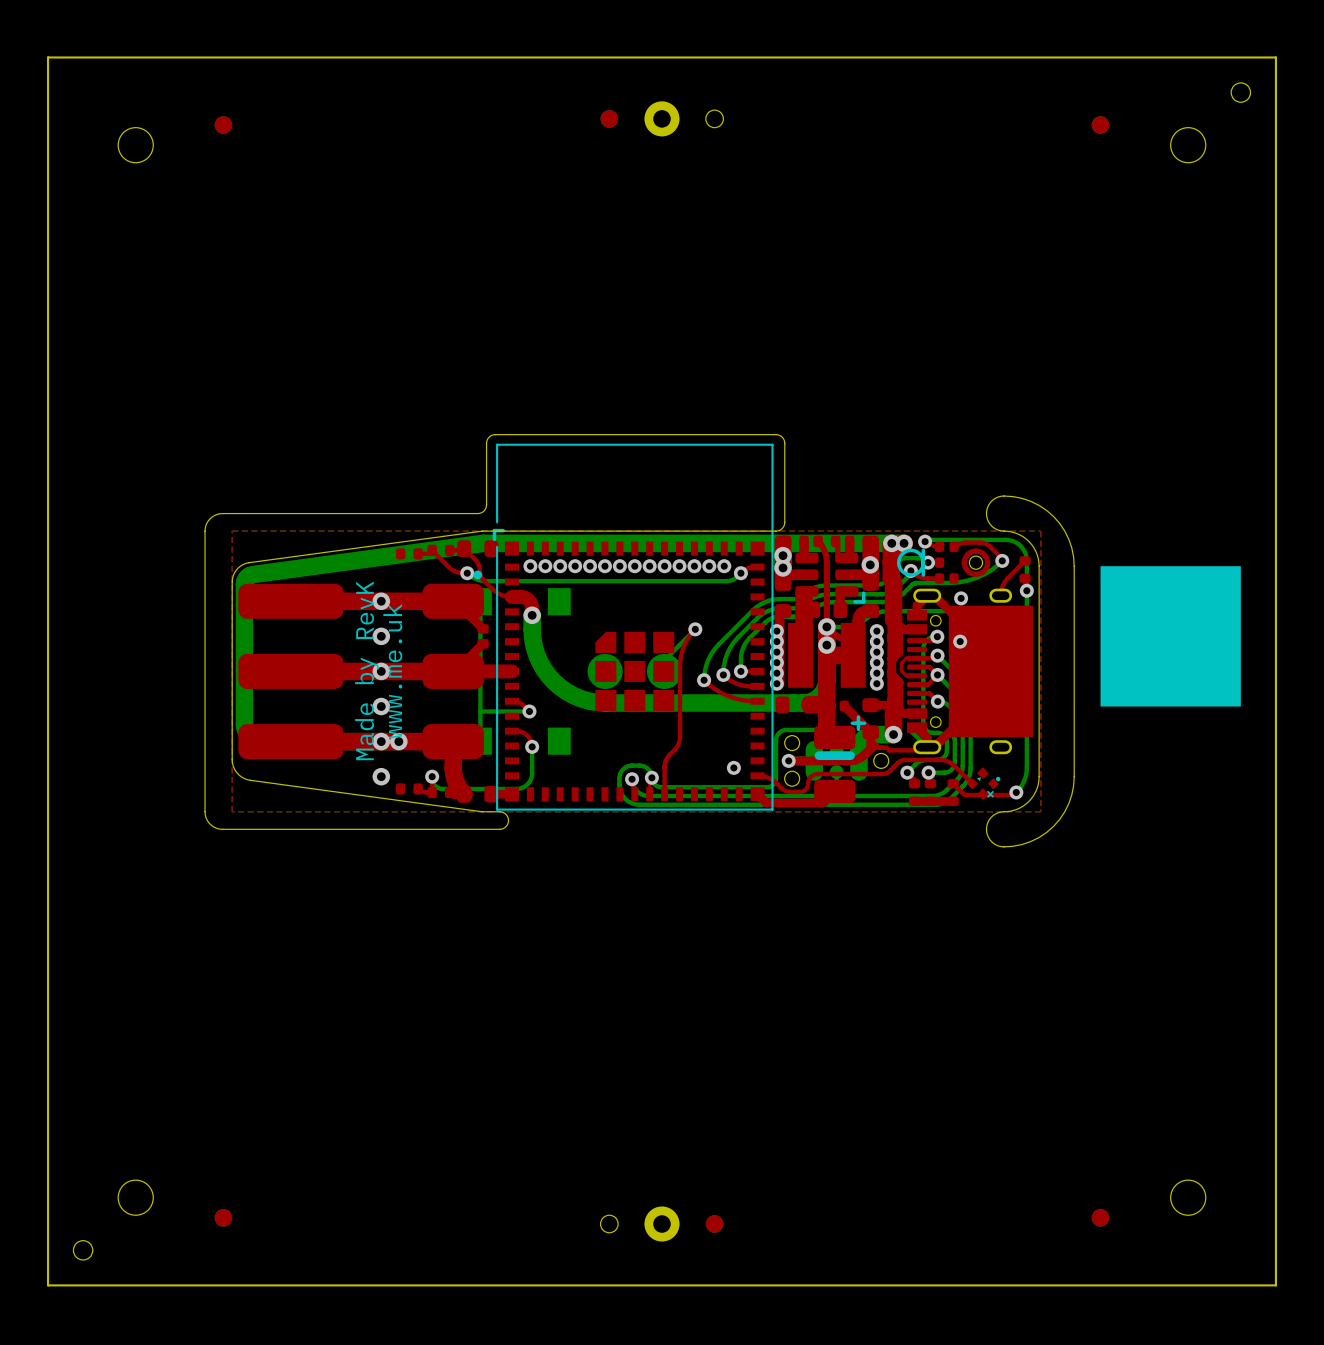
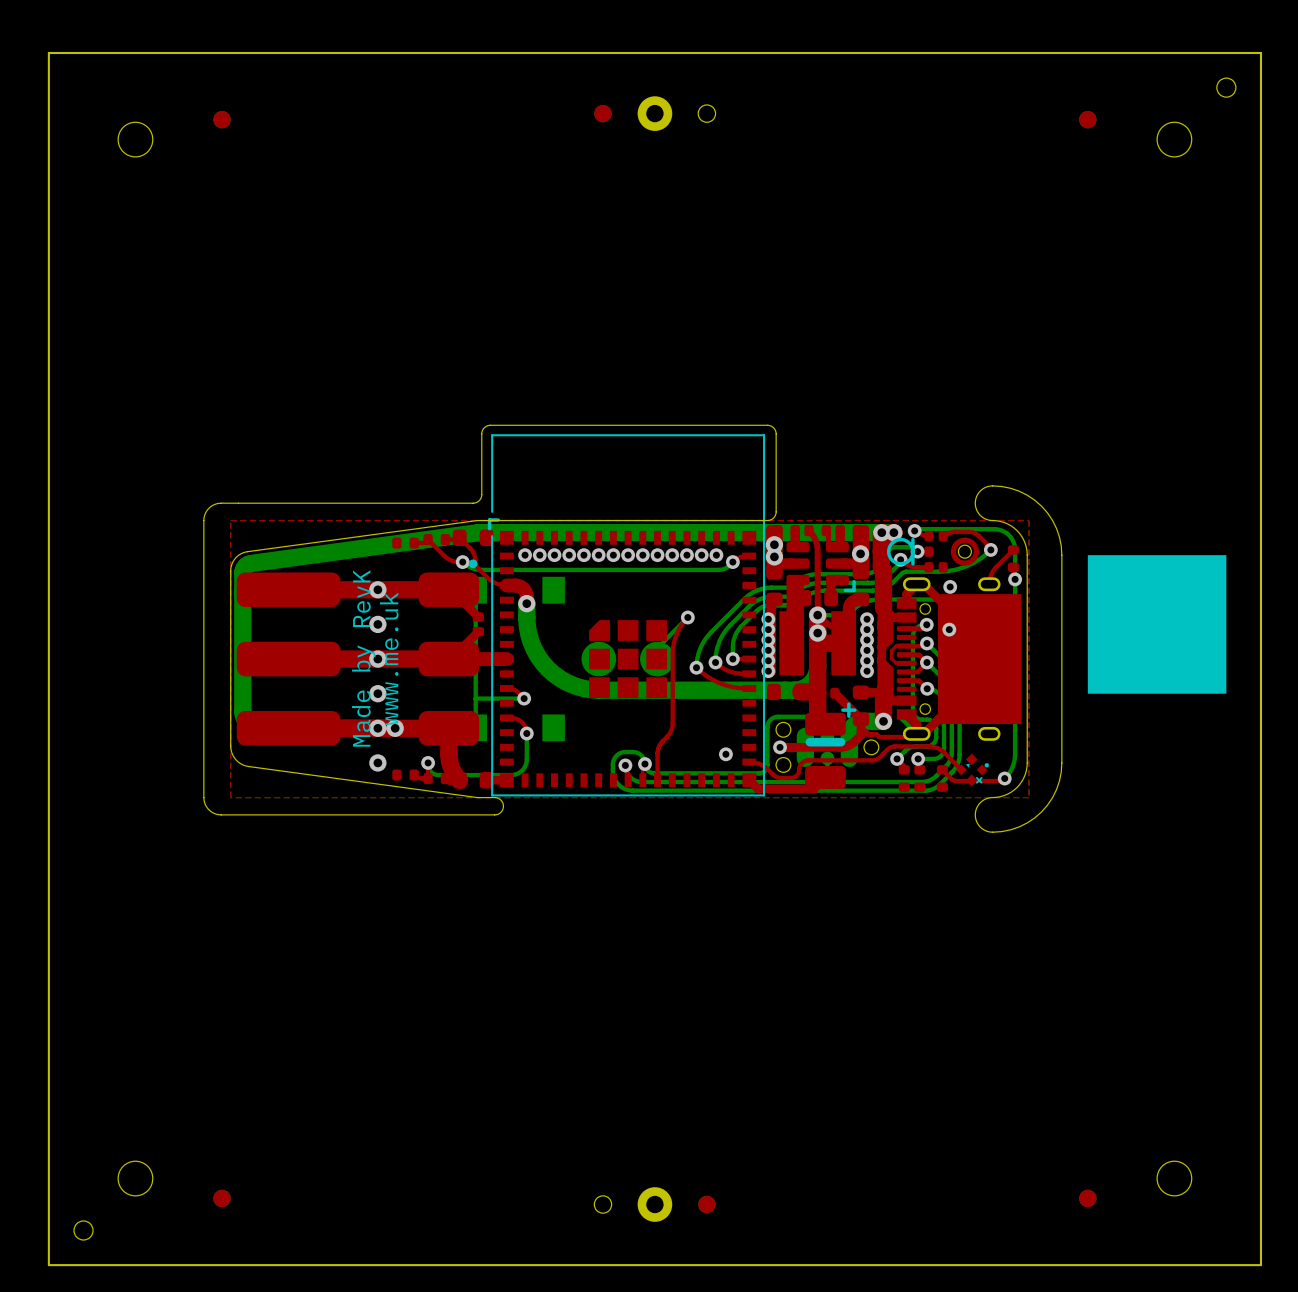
top track: (914, 801) (953, 801) -> none

